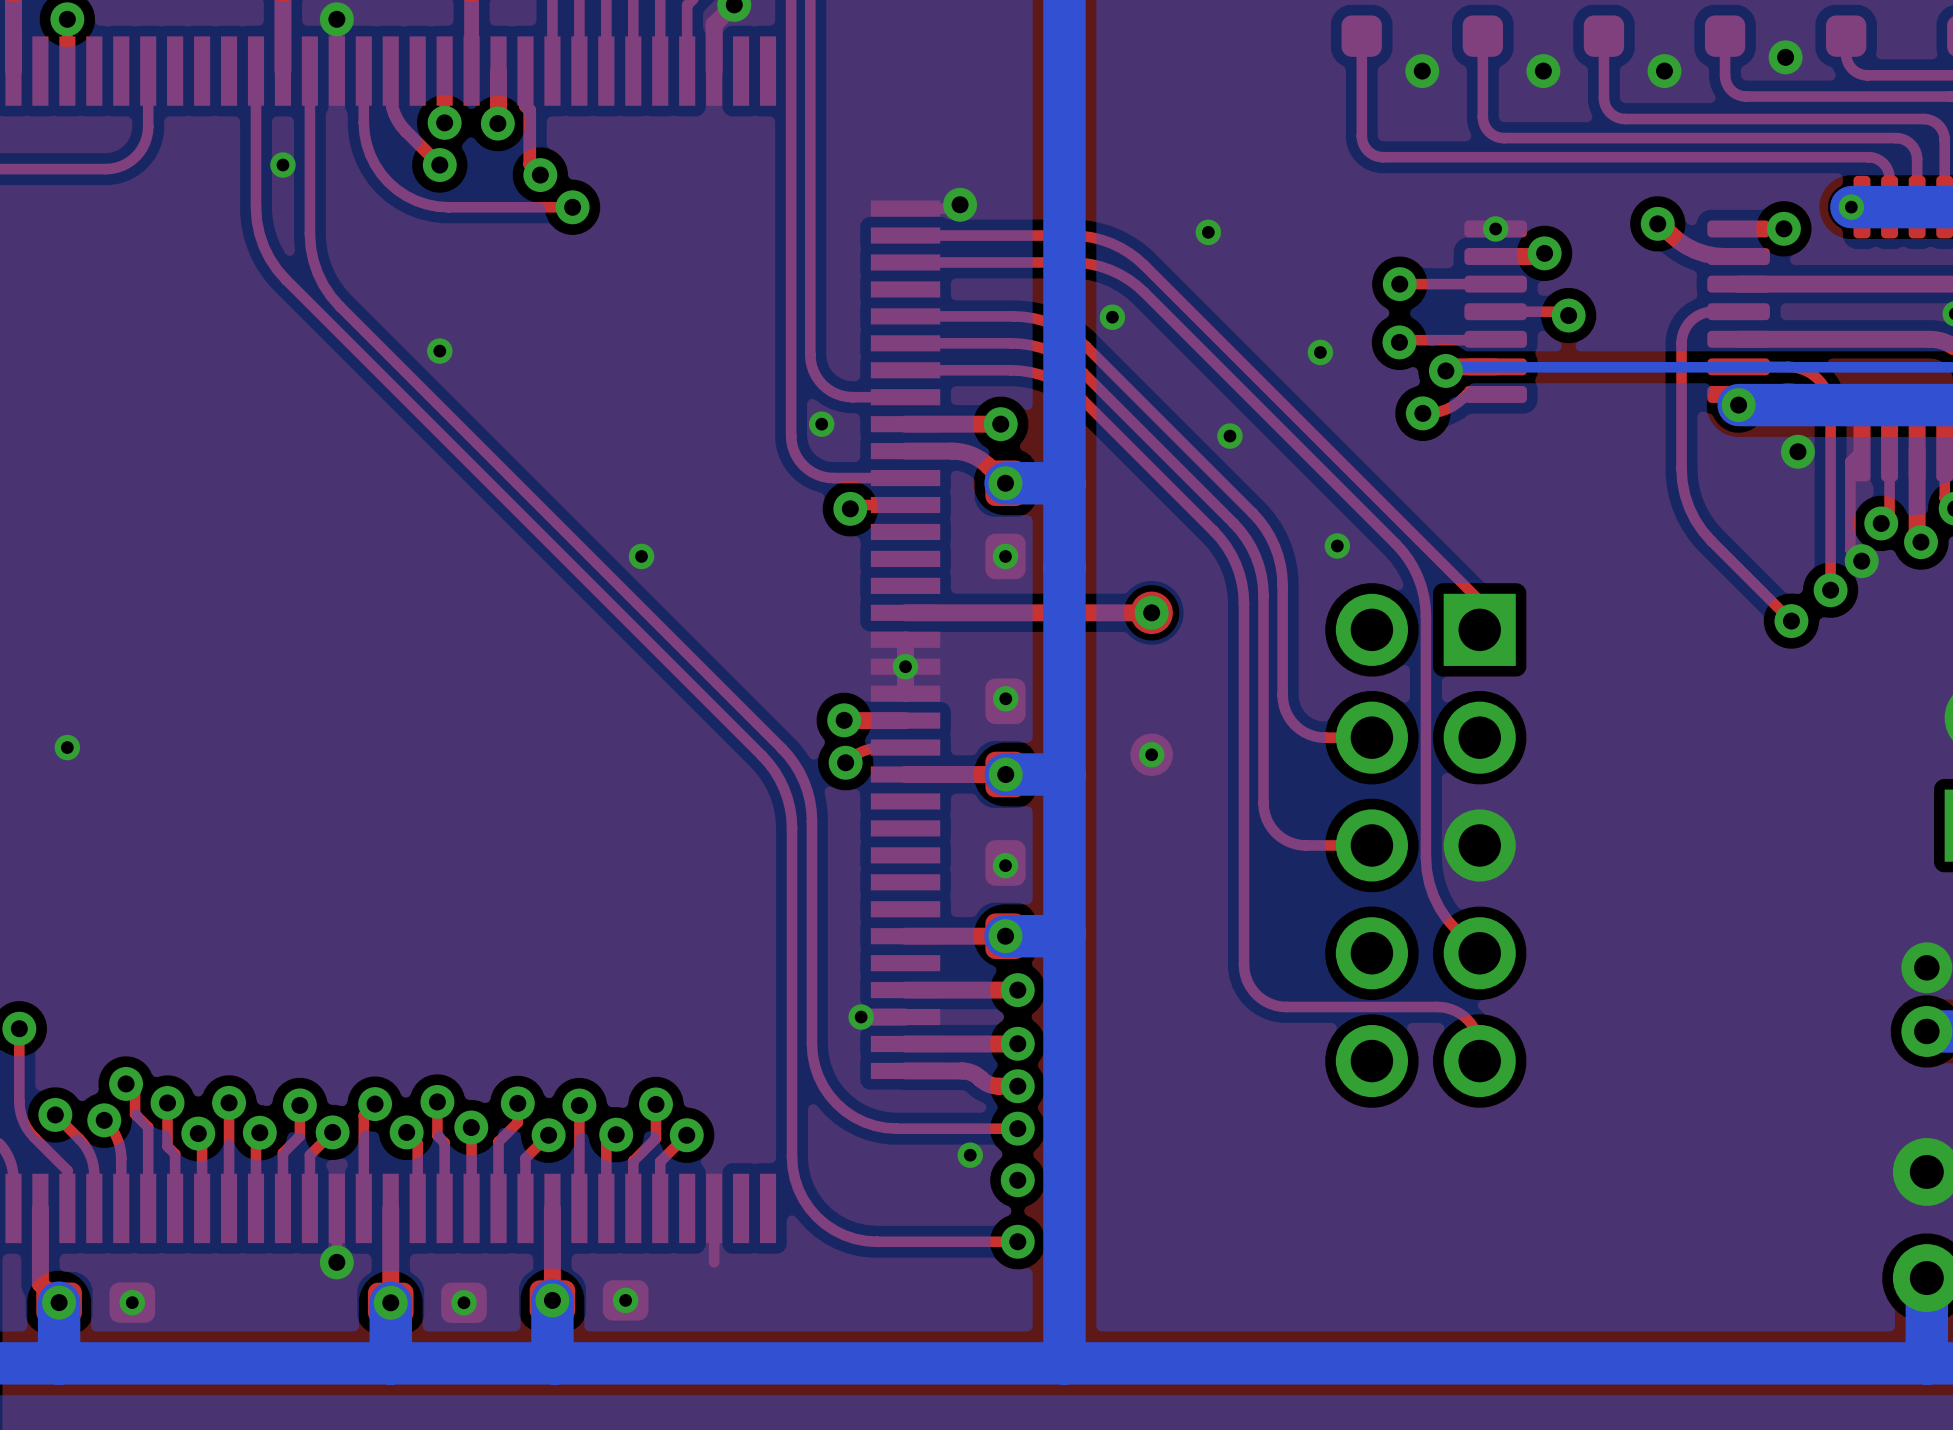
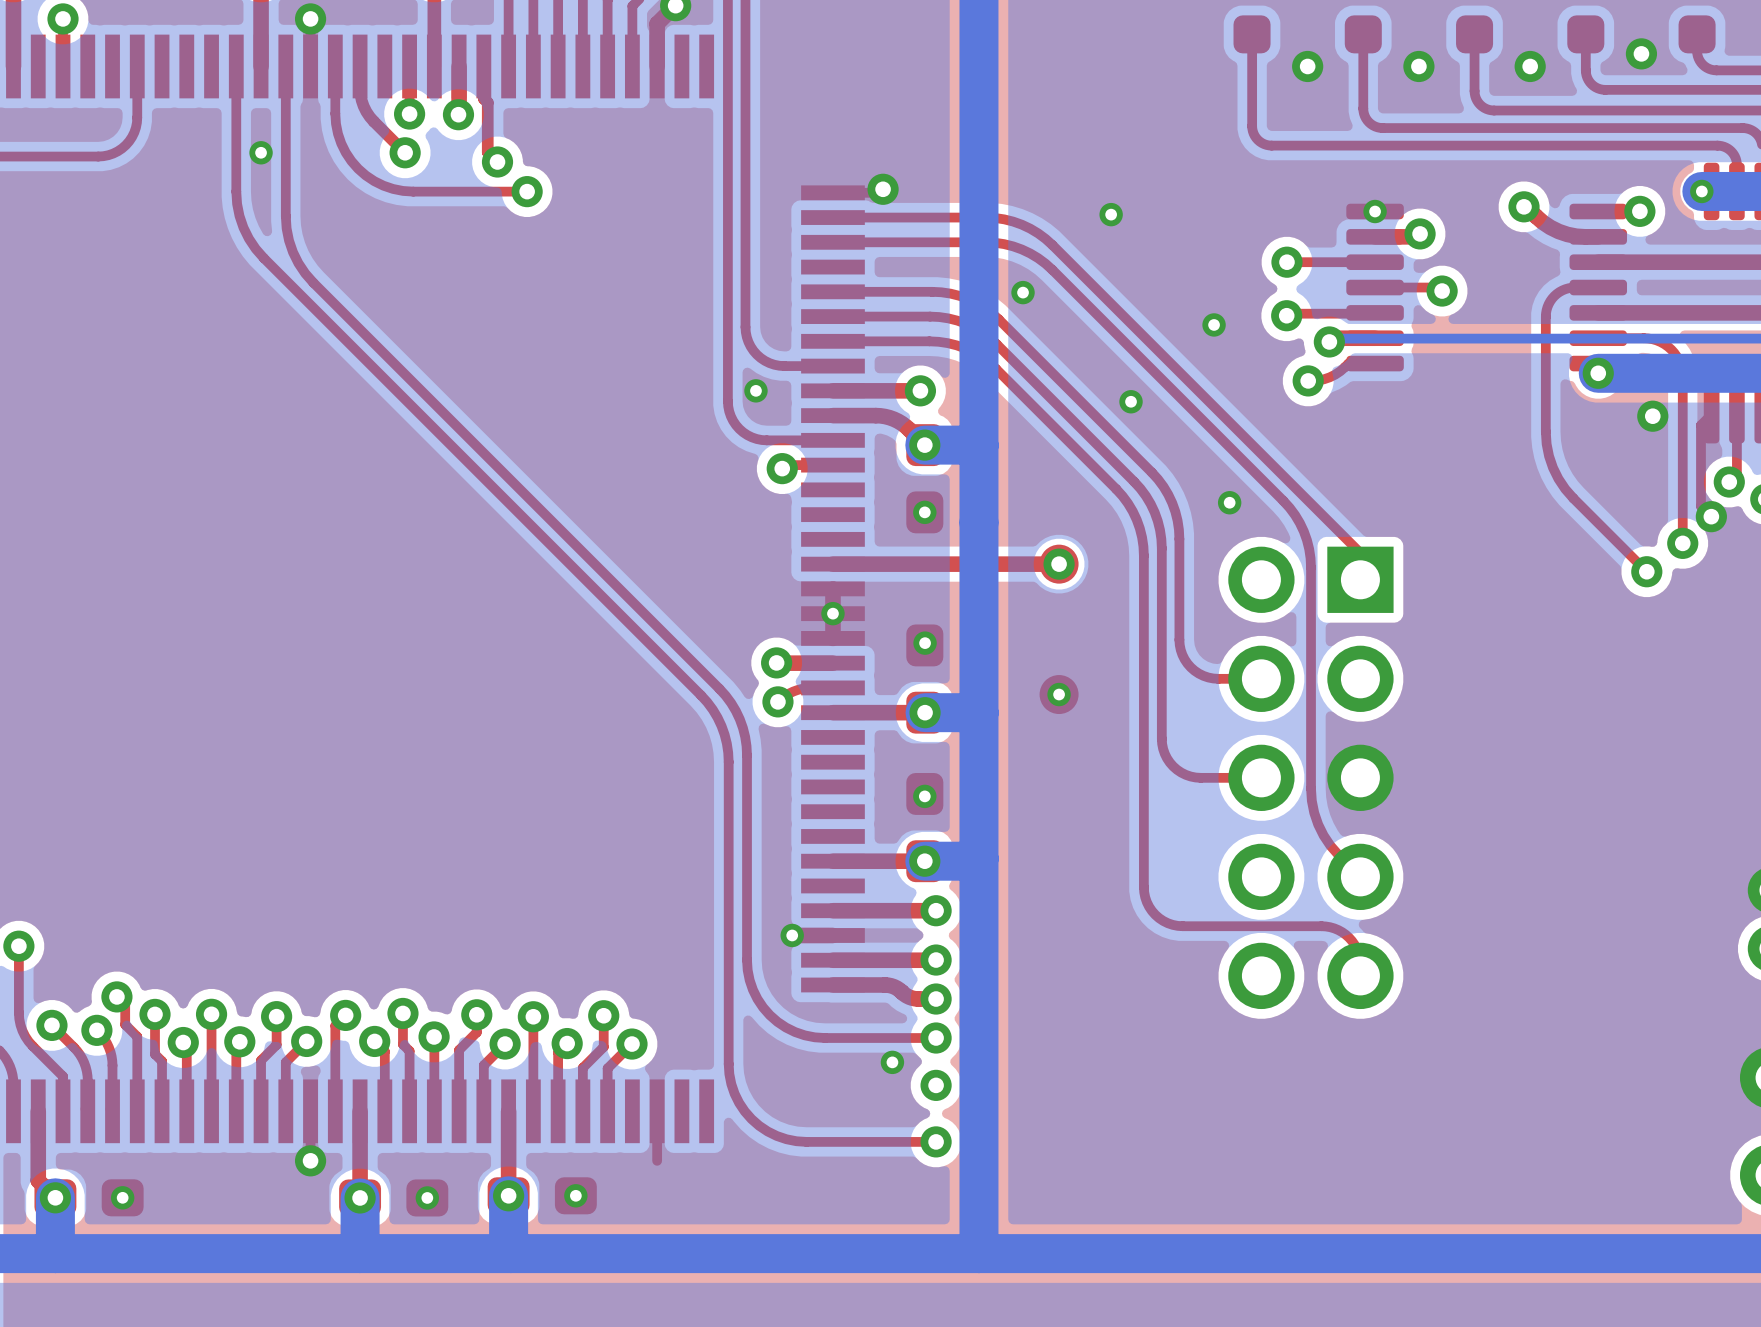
via: (439, 351) -> none
via: (641, 556) -> none
via: (67, 747) -> none

